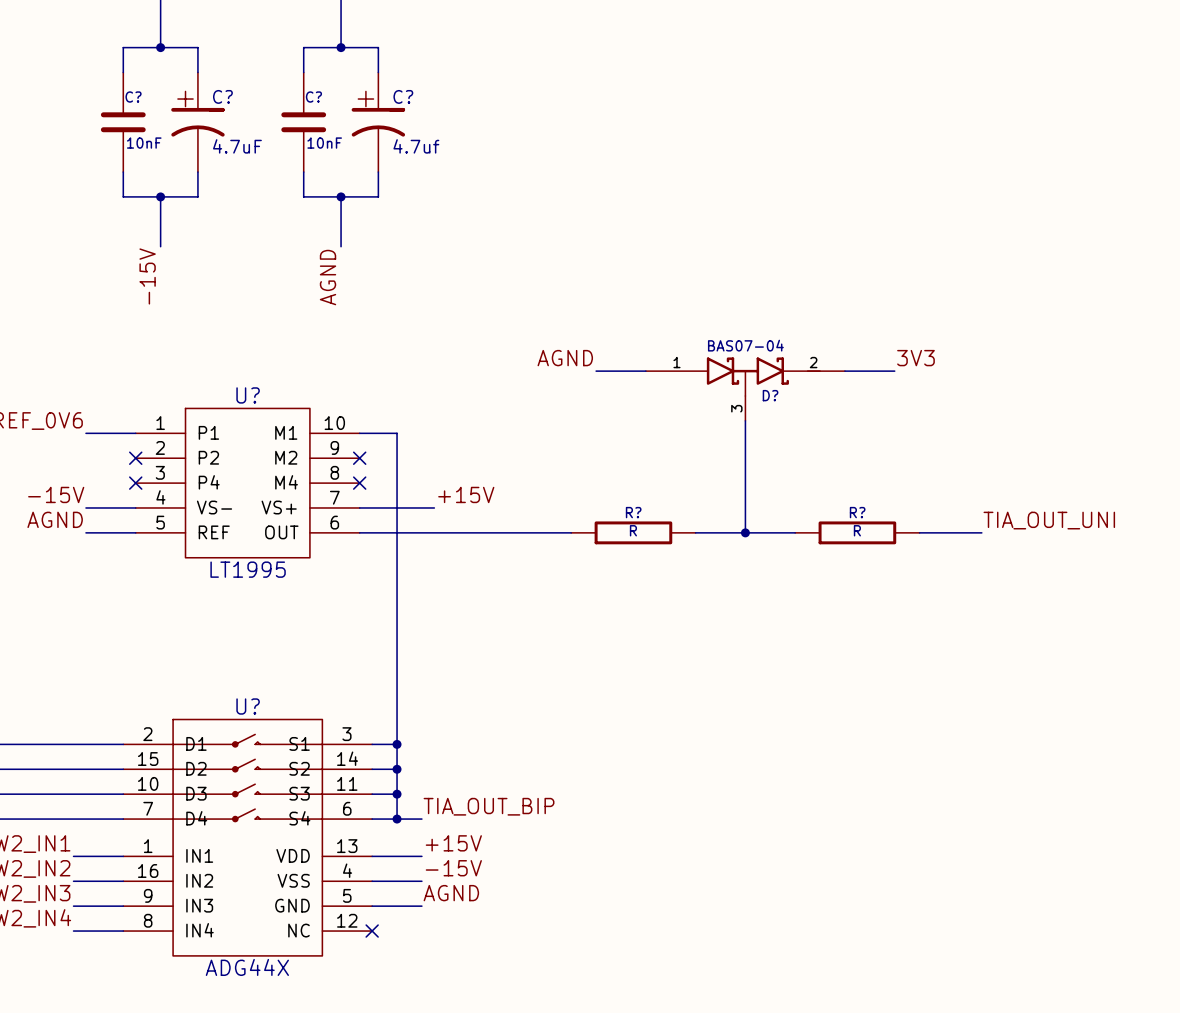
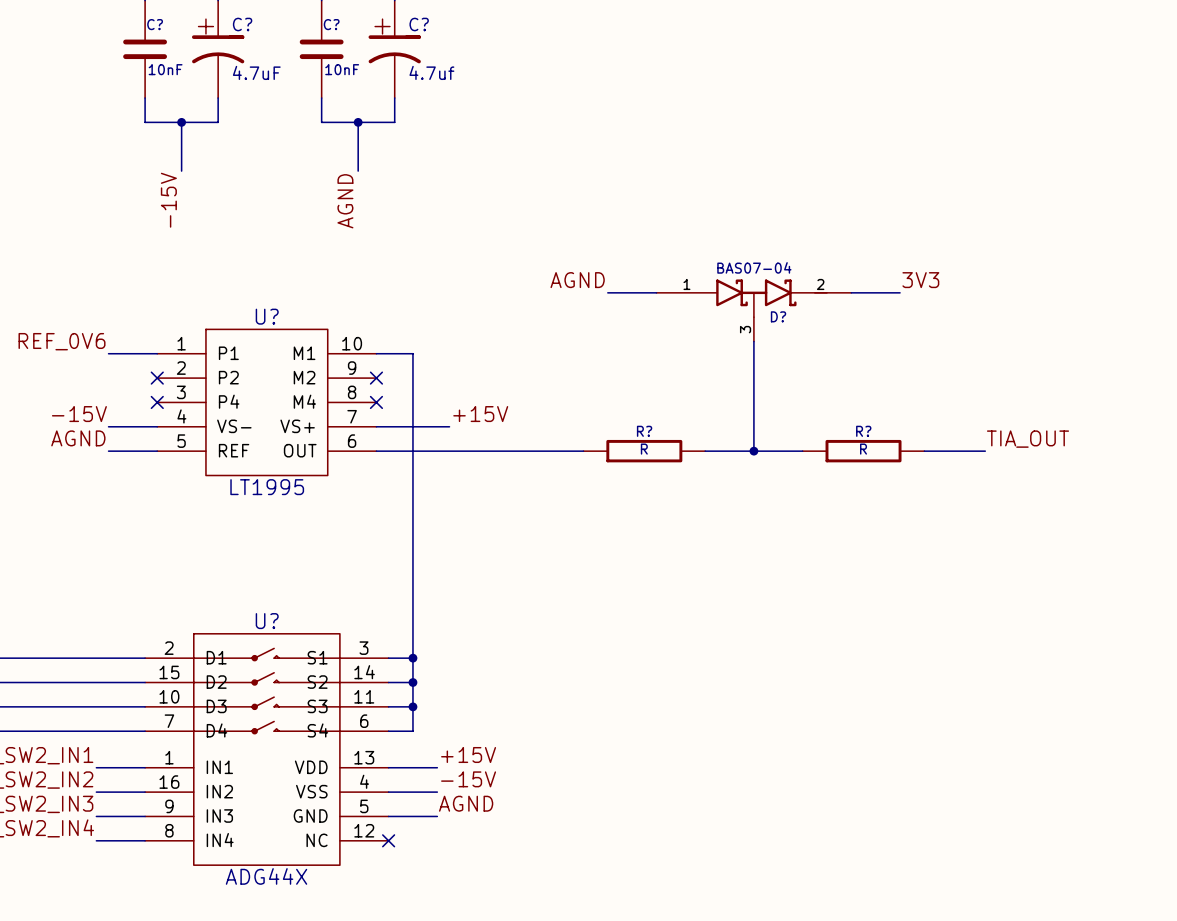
label: TIA_OUT_UNI (1049, 520) -> TIA_OUT (1028, 439)
label: TIA_OUT_BIP (489, 806) -> none
wire: (397, 819) (421, 819) -> none
junction: (397, 819) -> none

